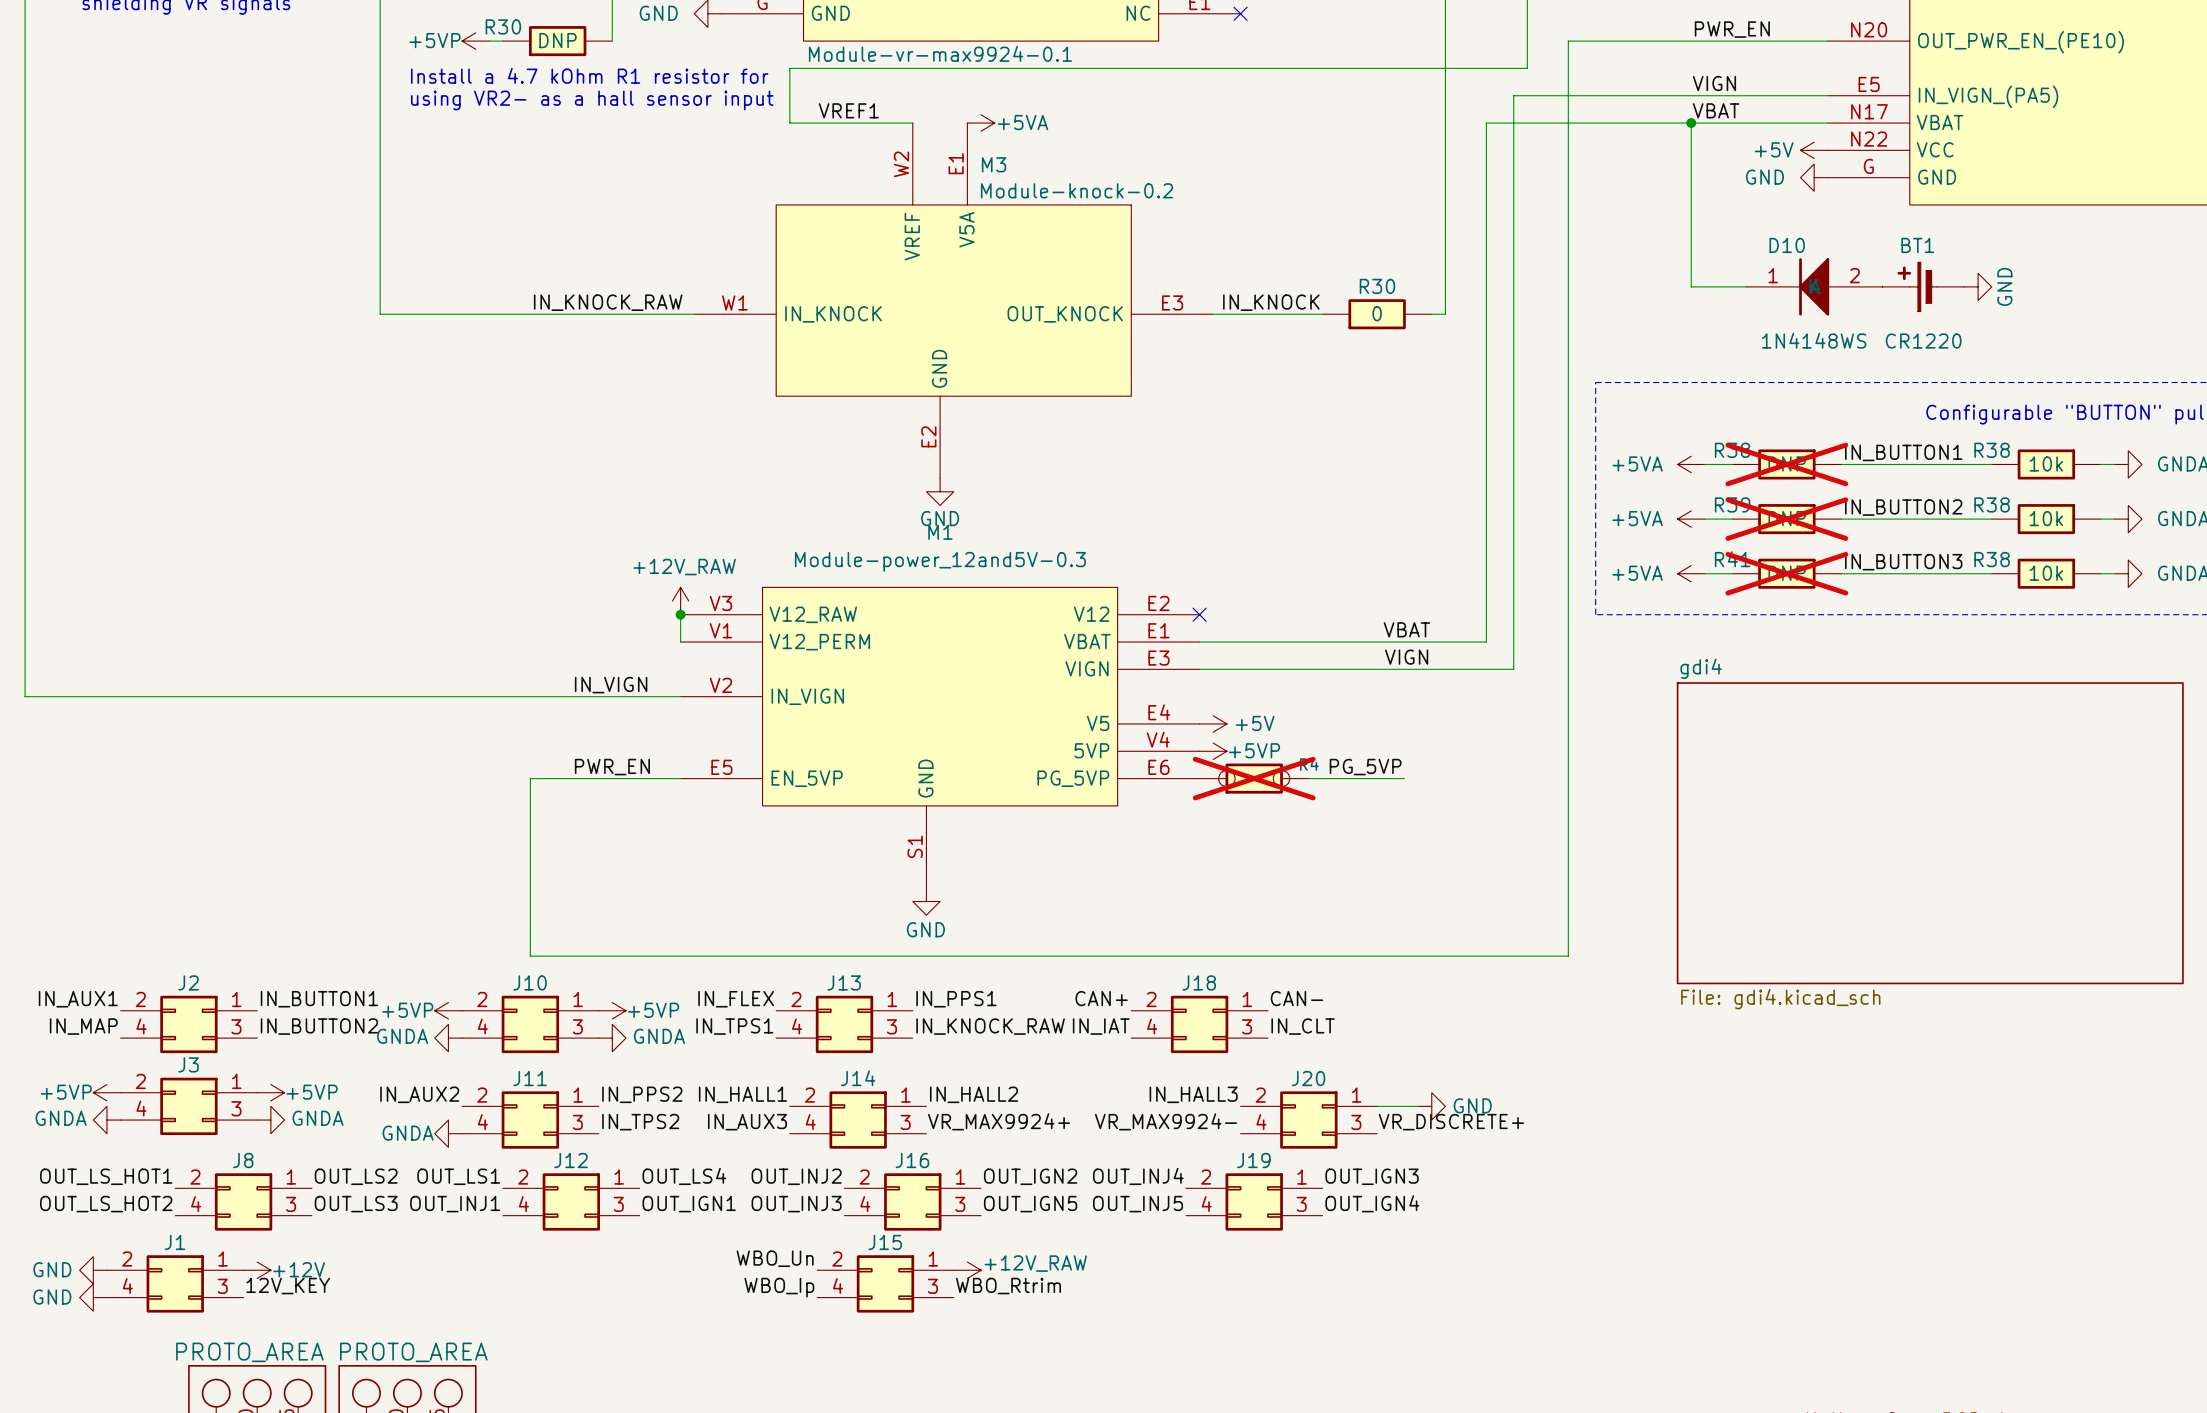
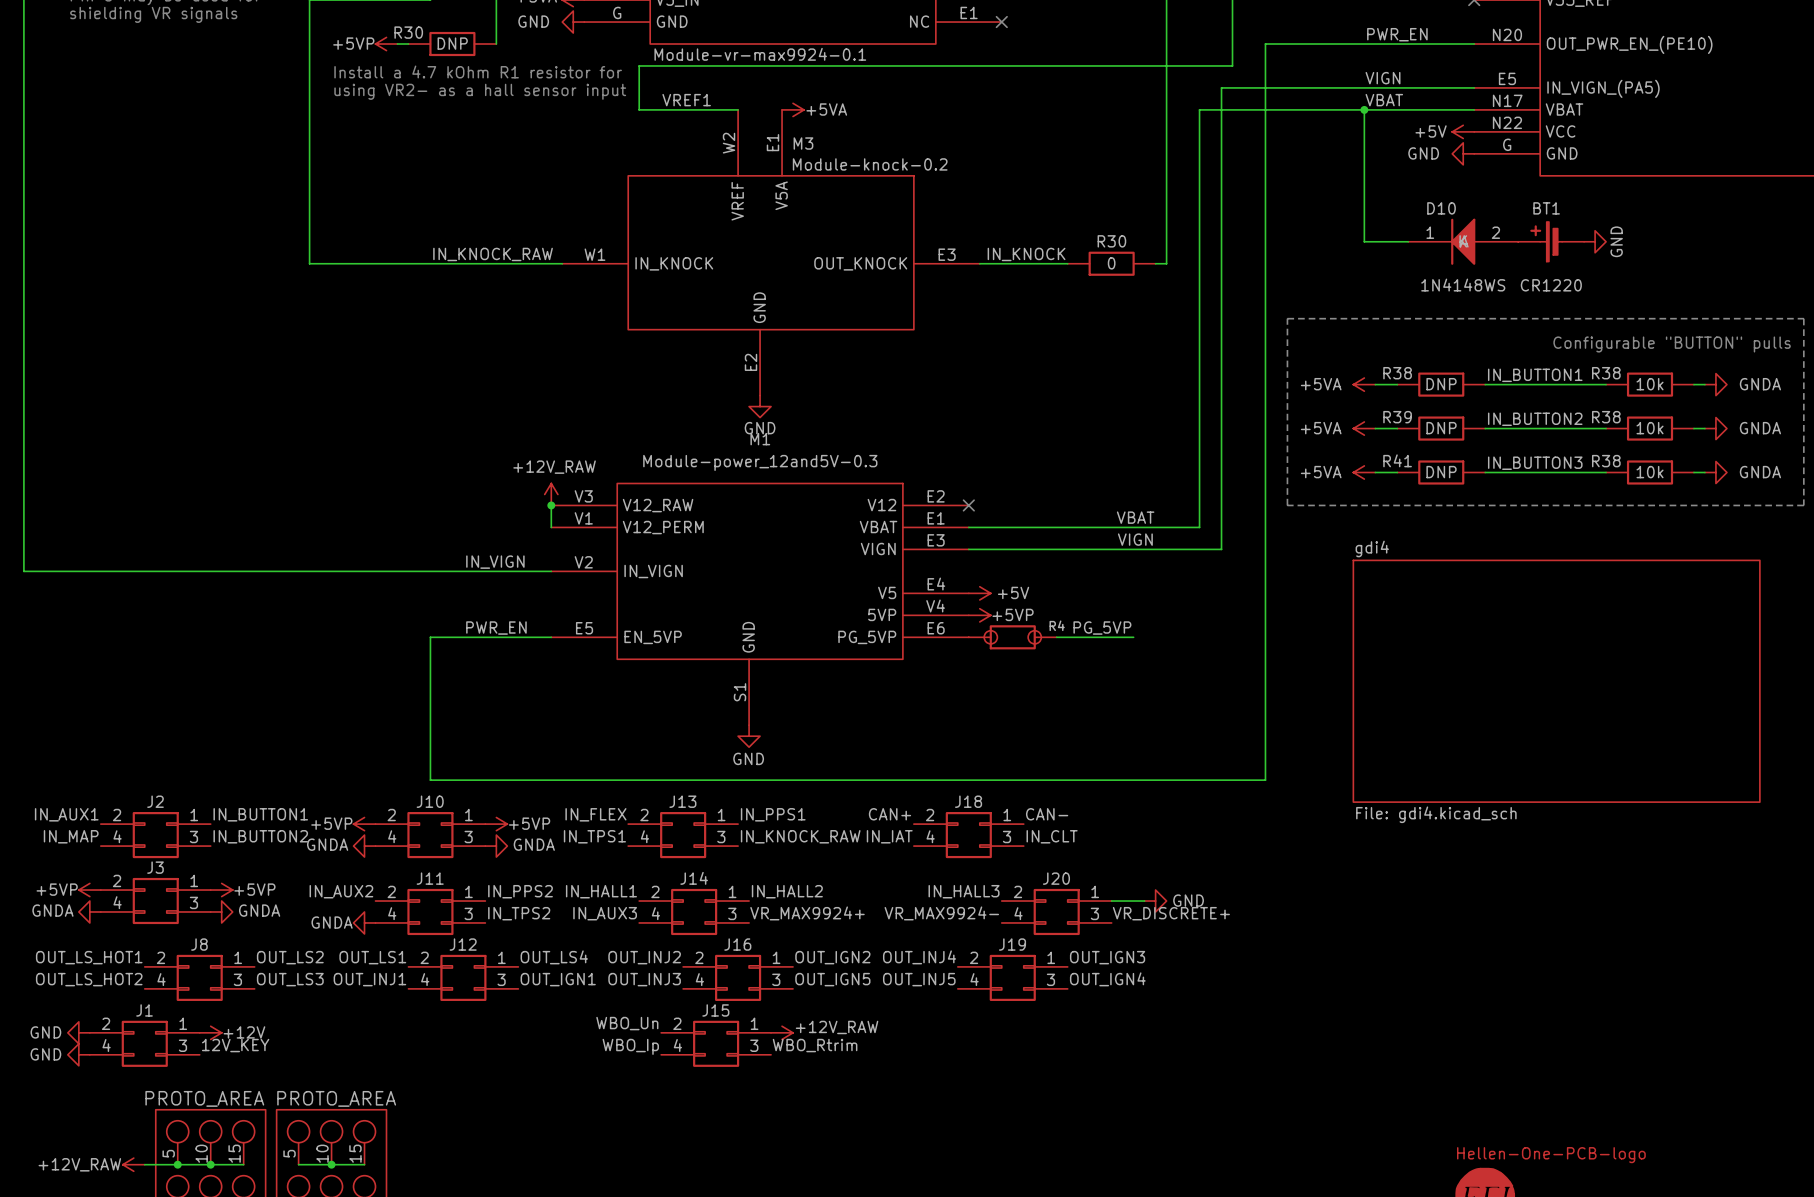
R38 do-not-place cross: (1786, 464) -> none
R39 do-not-place cross: (1786, 519) -> none
R41 do-not-place cross: (1786, 573) -> none
R4 do-not-place cross: (1254, 778) -> none

